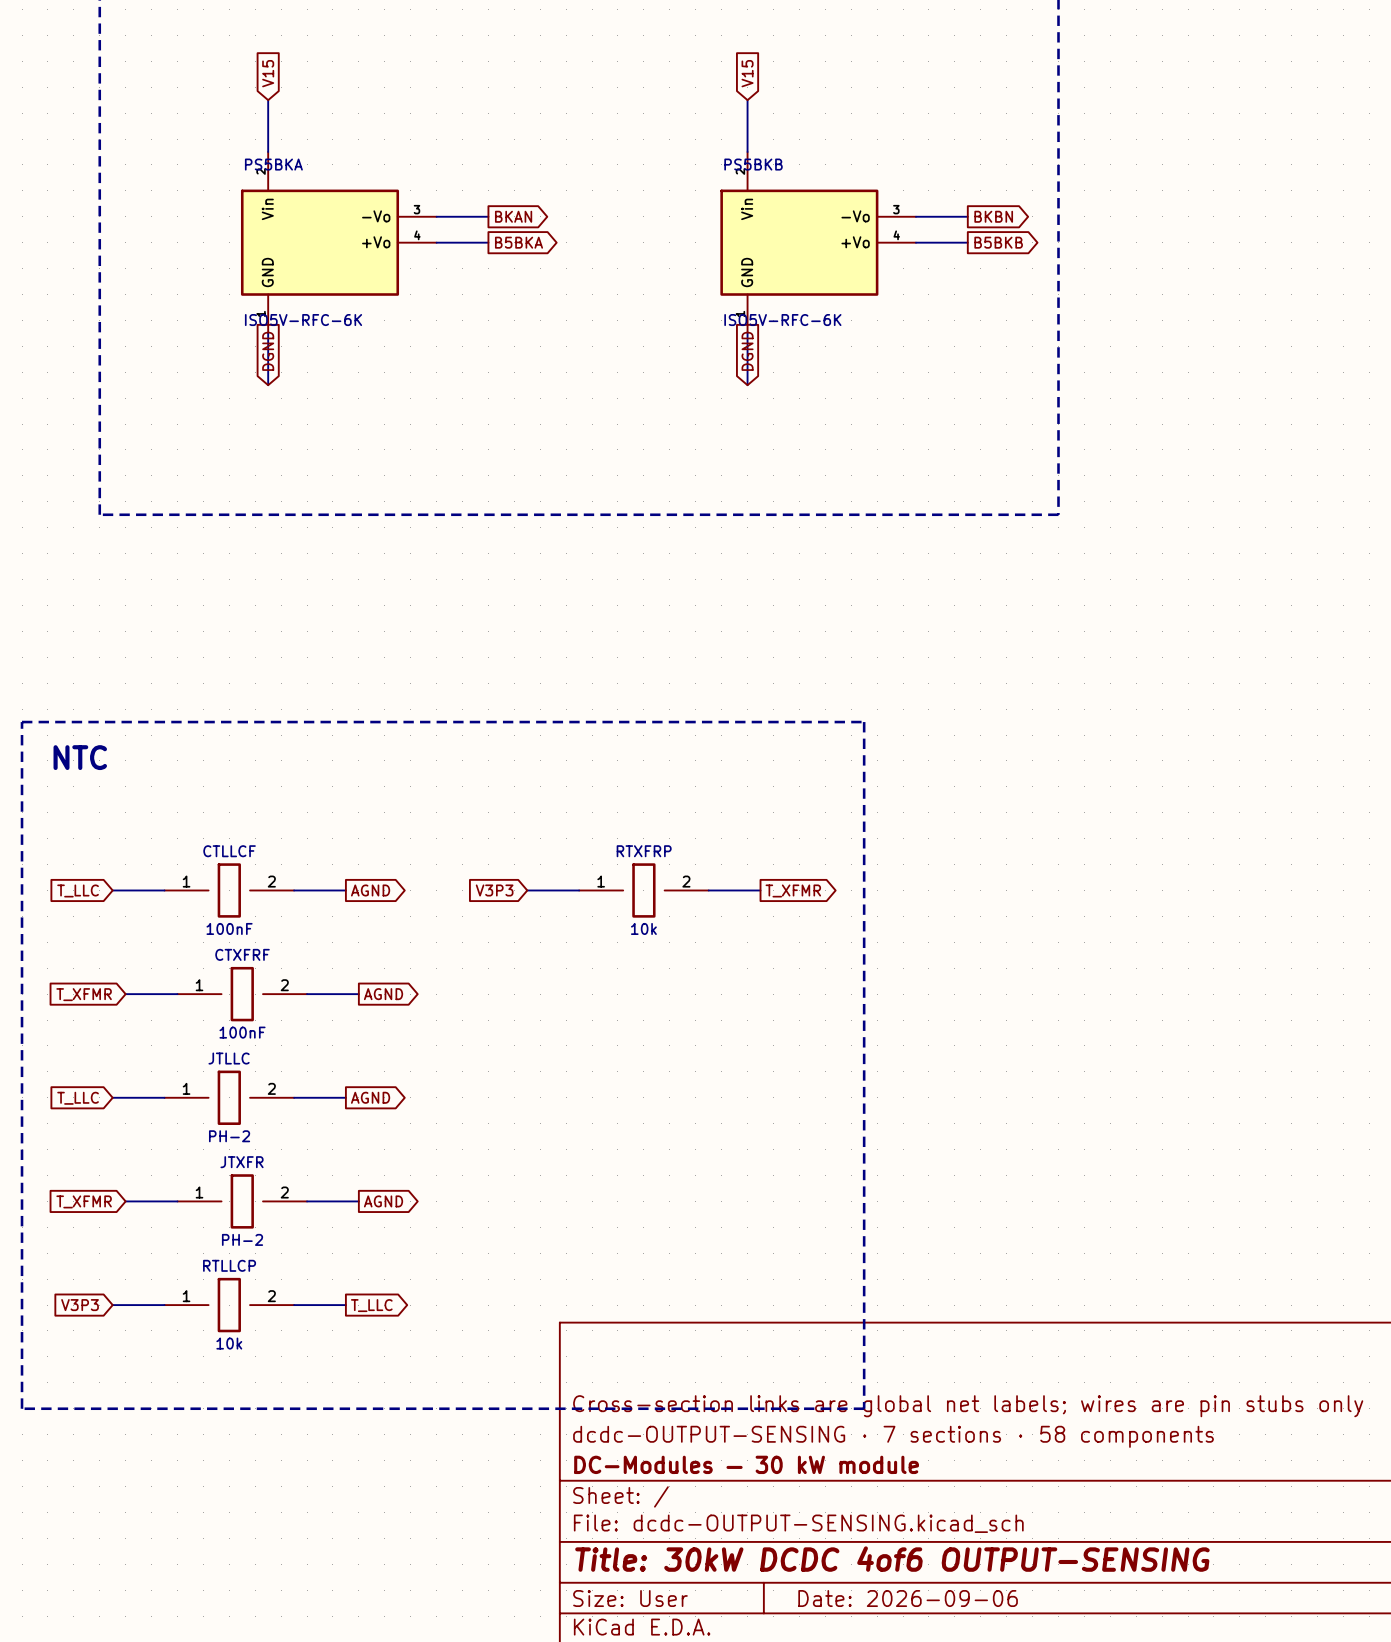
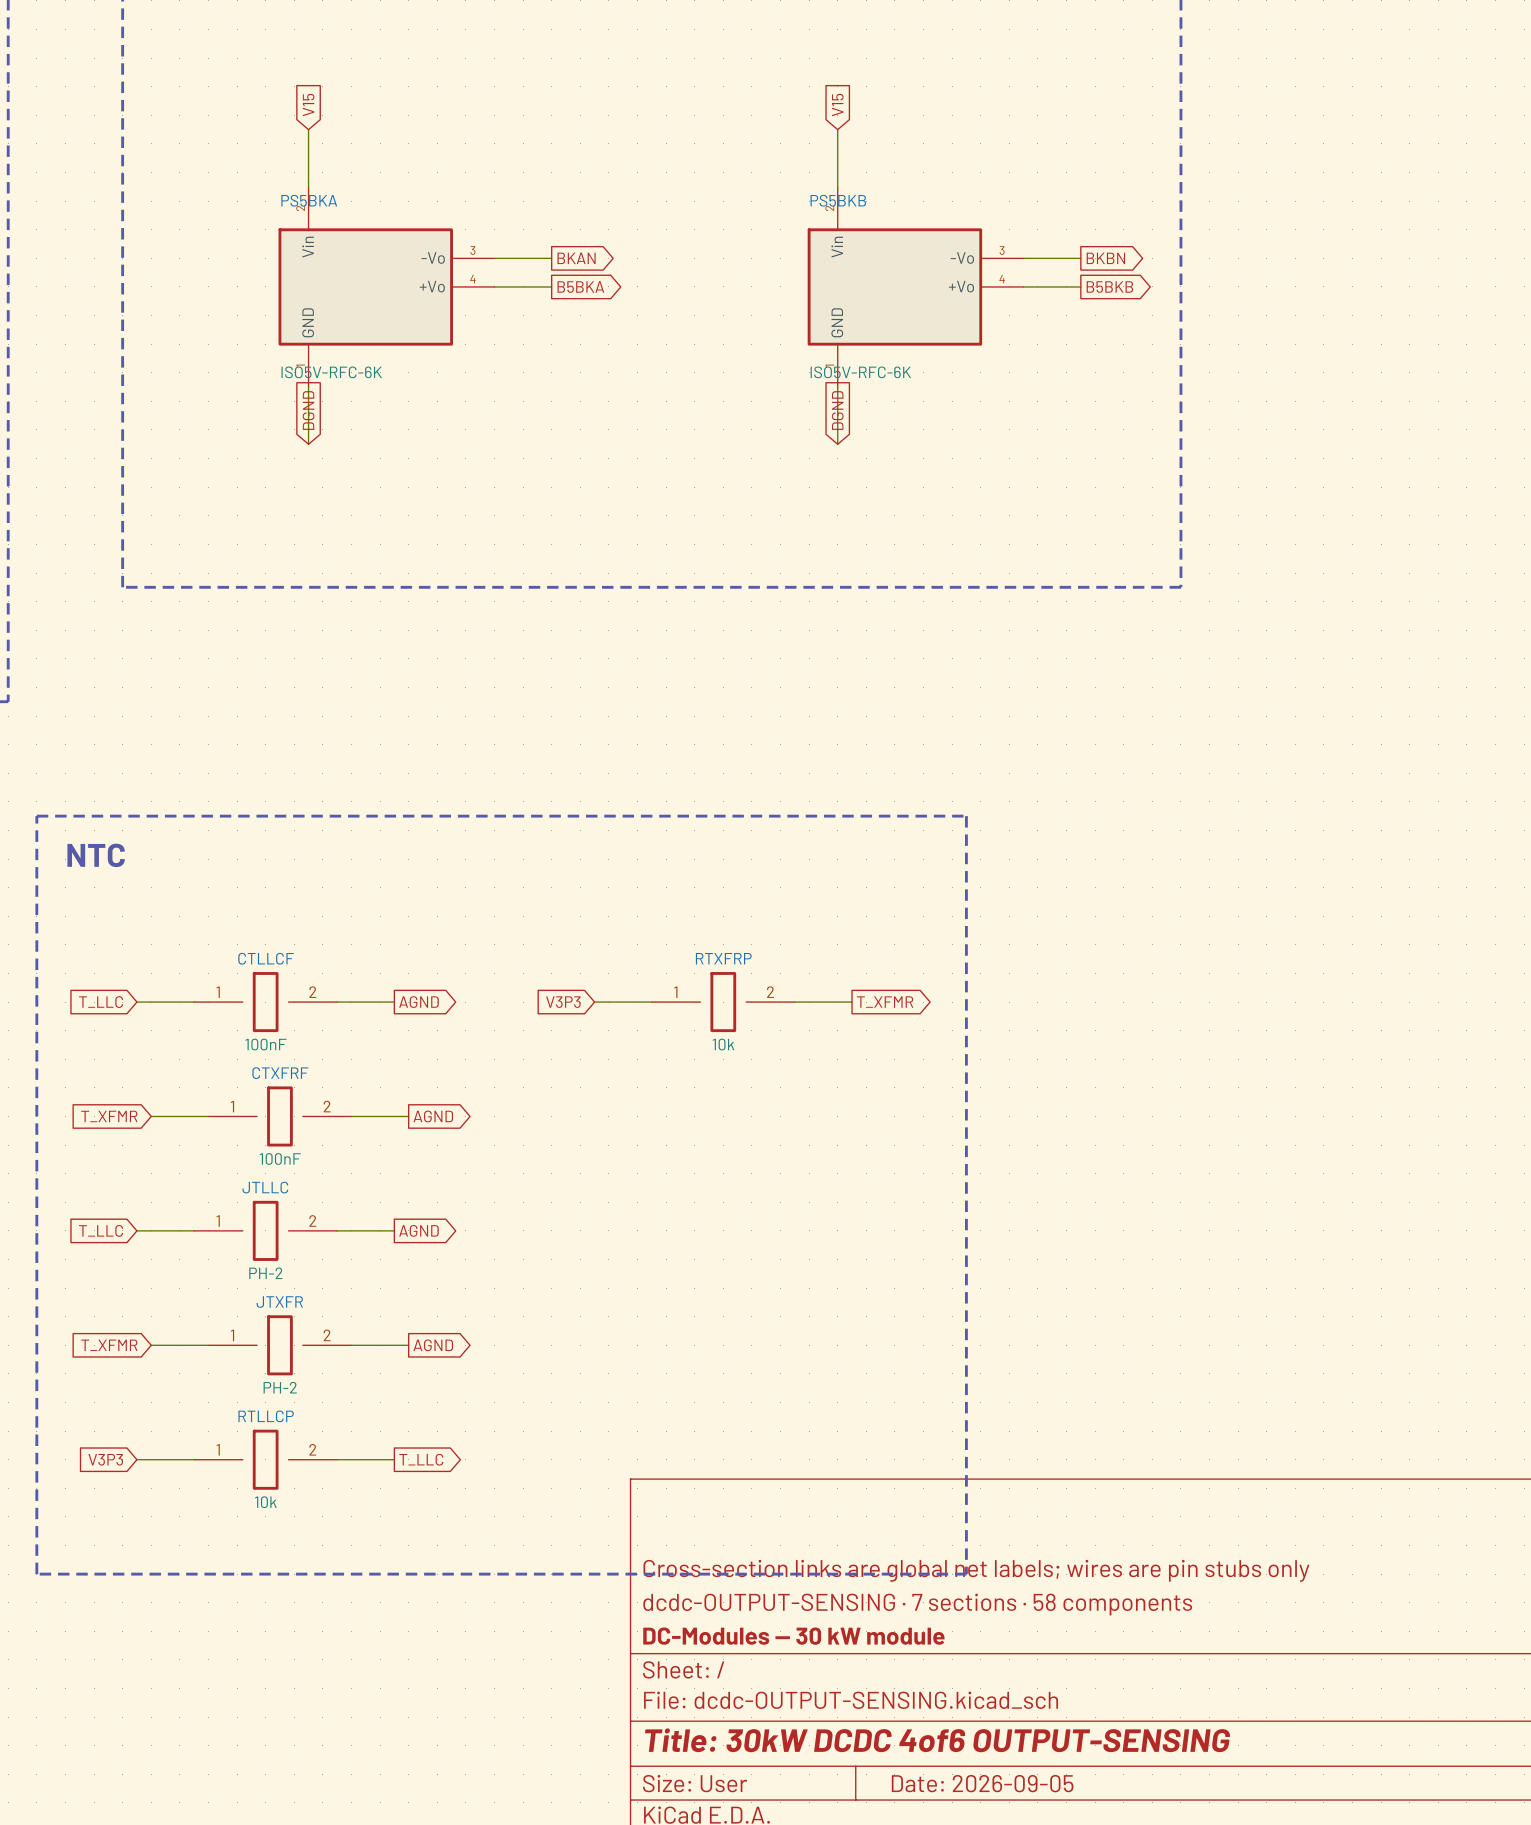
title block: Date: 2026-09-06 (908, 1598) -> Date: 2026-09-05 (982, 1783)

